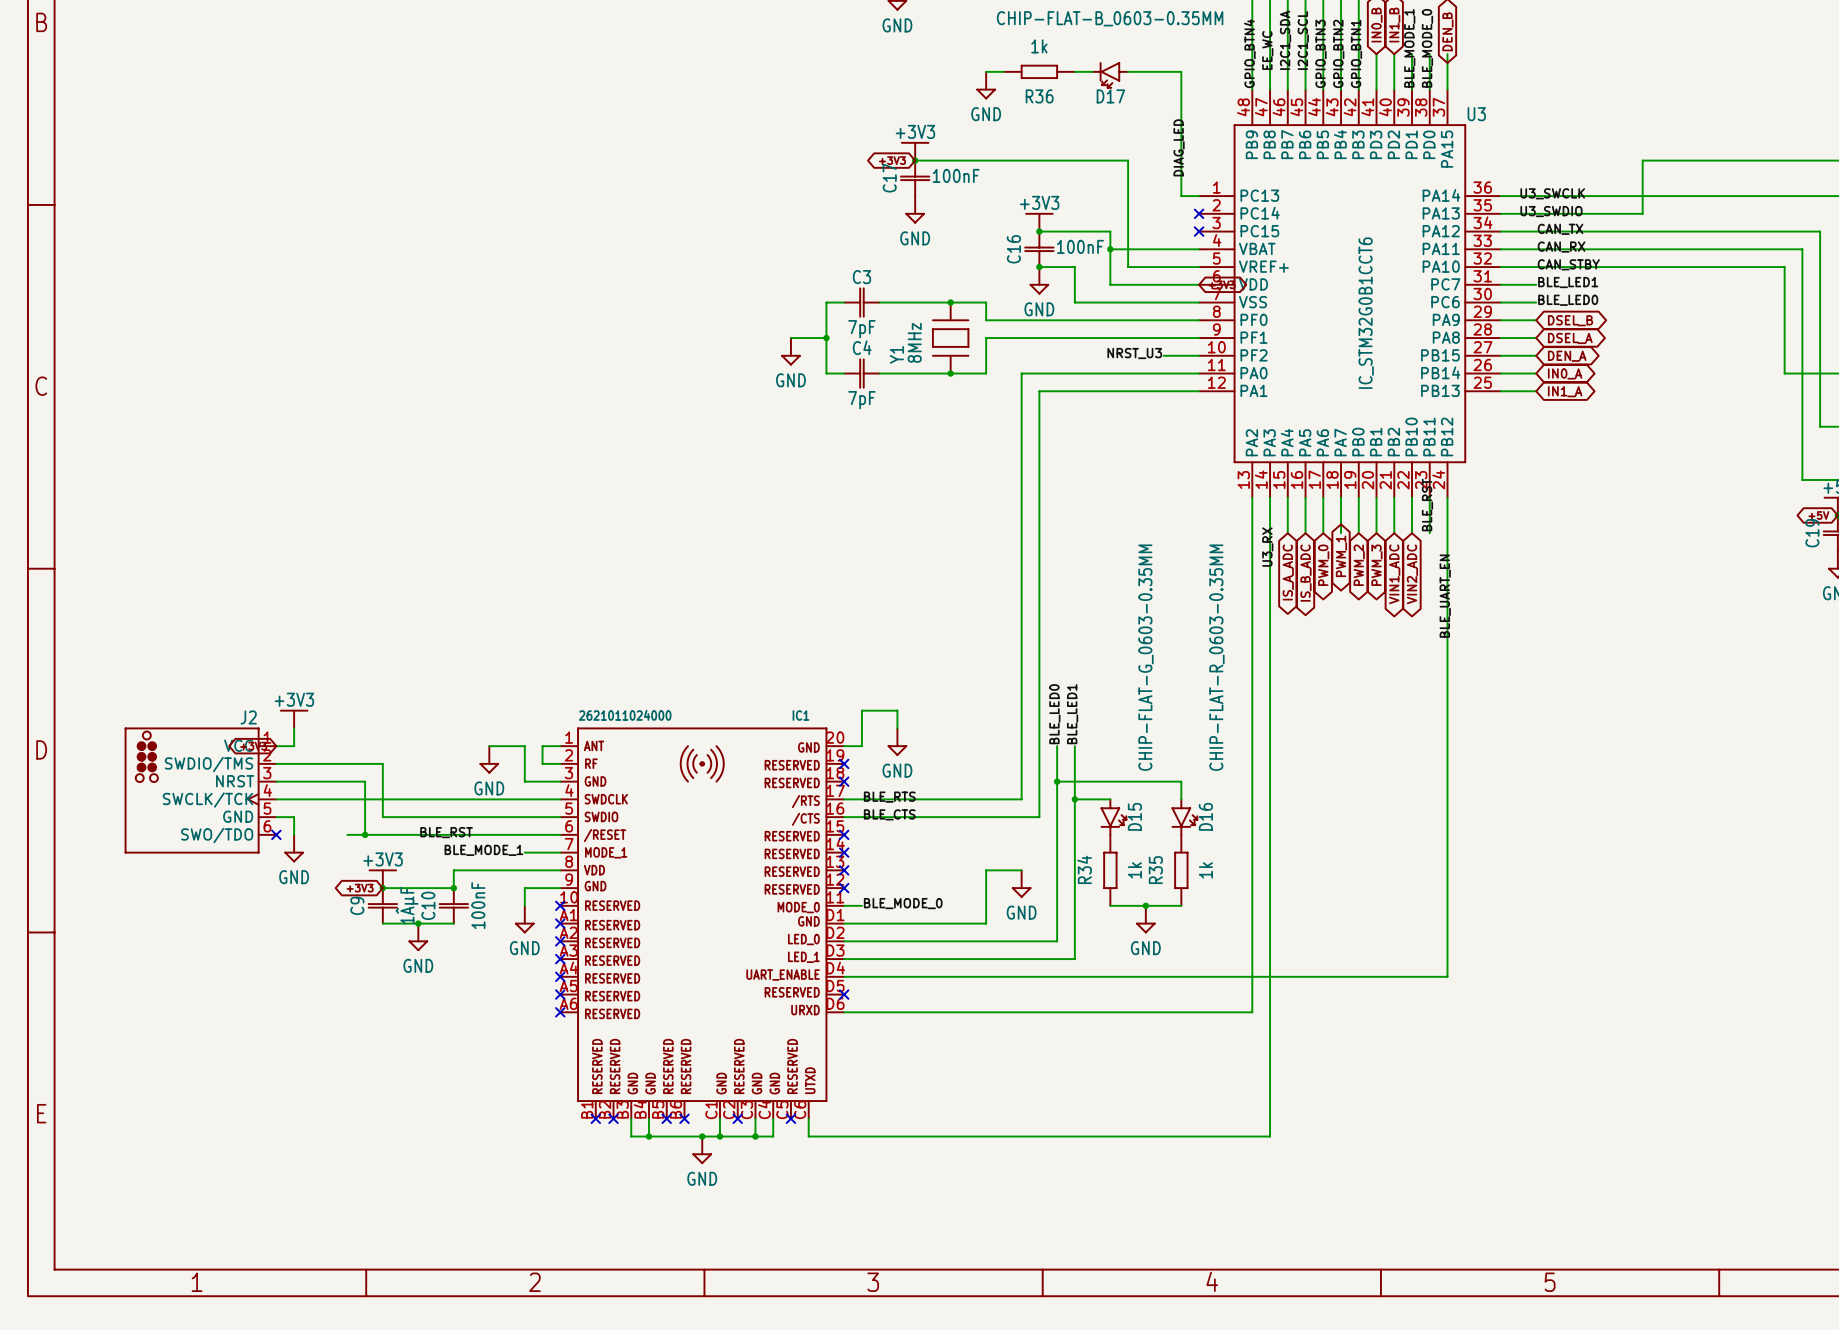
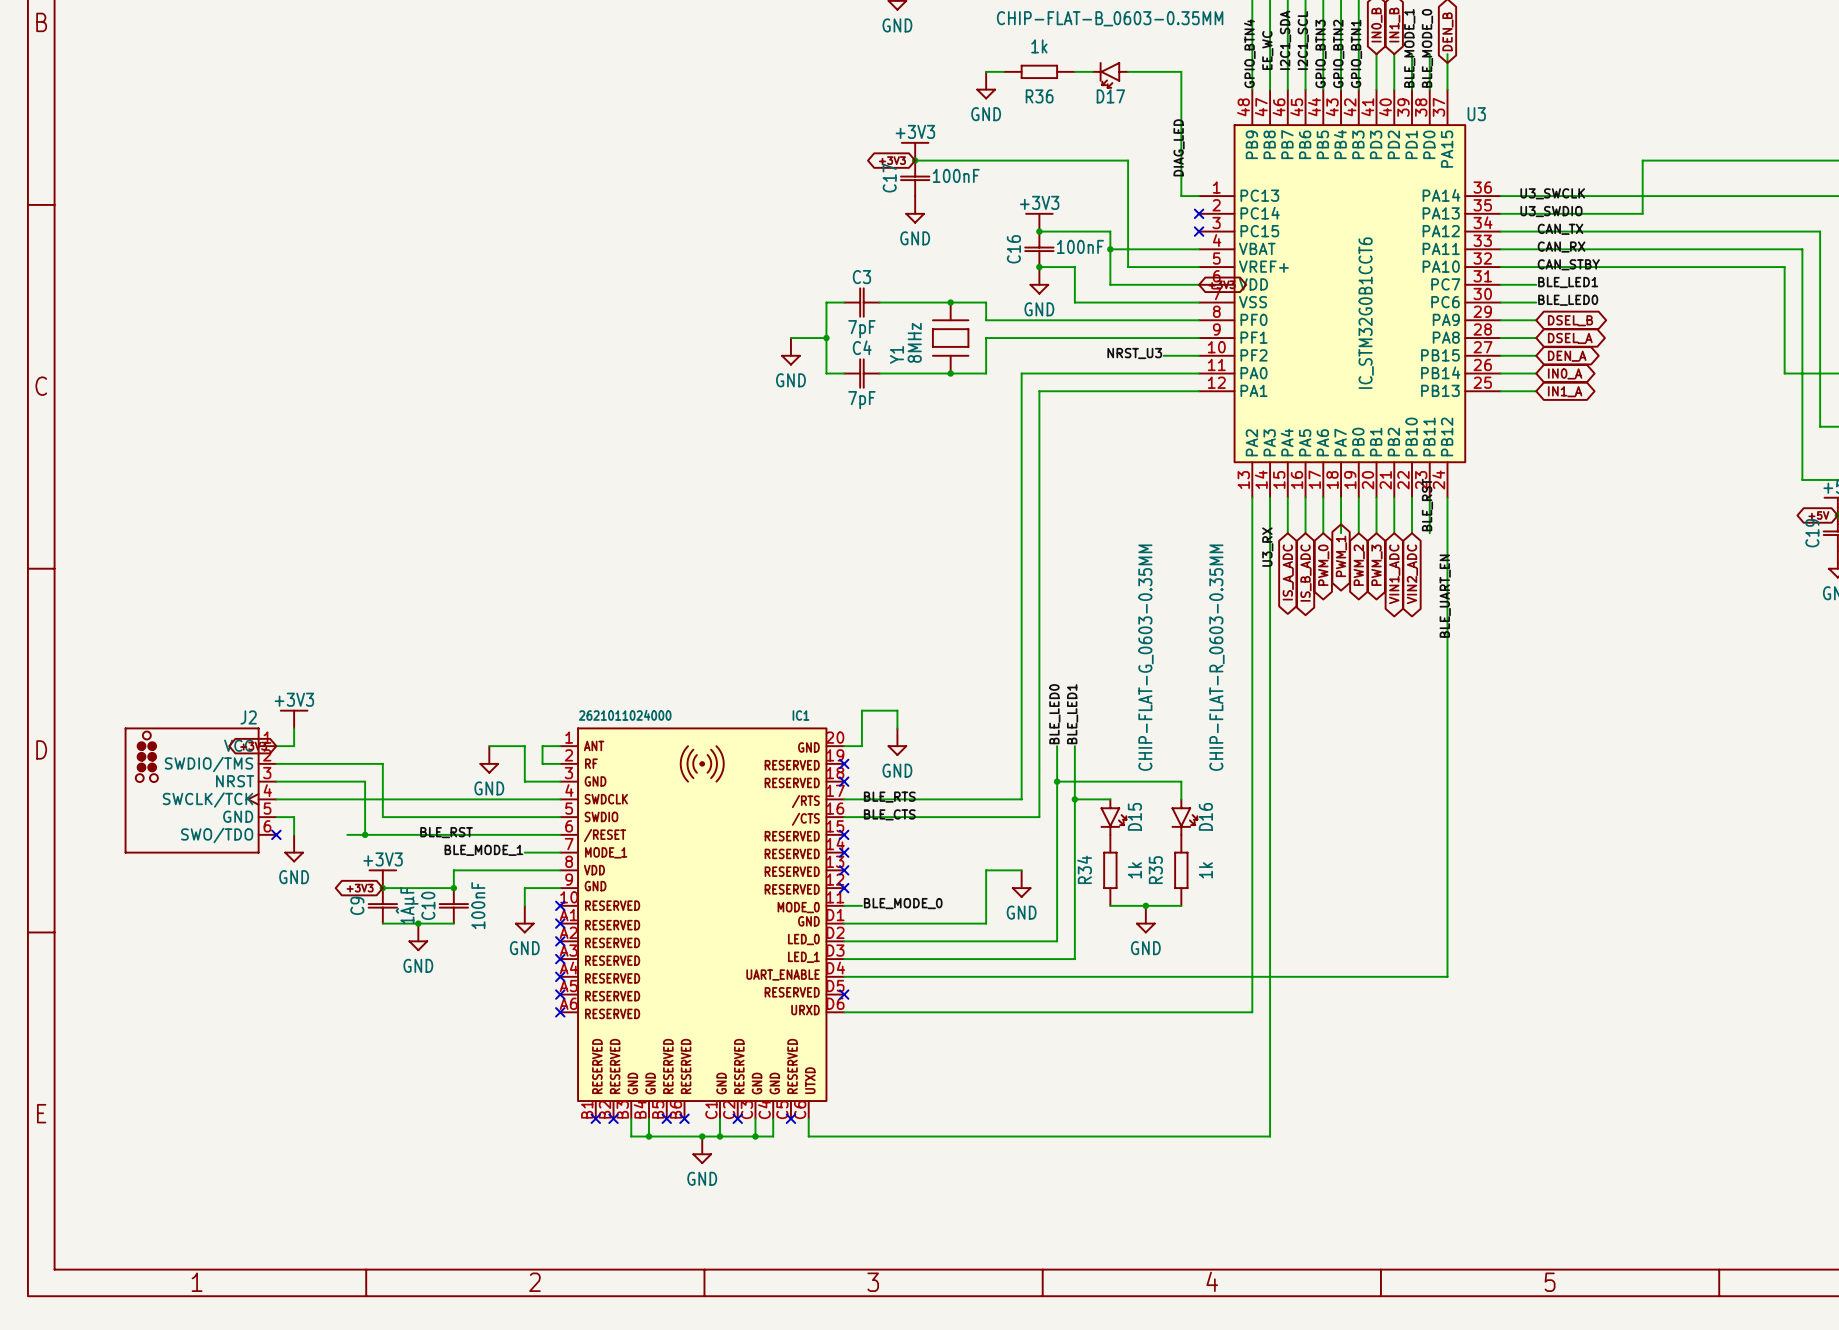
U3 symbol: [1199, 89, 1501, 498] -> [1199, 89, 1501, 498]
IC1 symbol: [560, 727, 845, 1119] -> [560, 727, 845, 1119]

